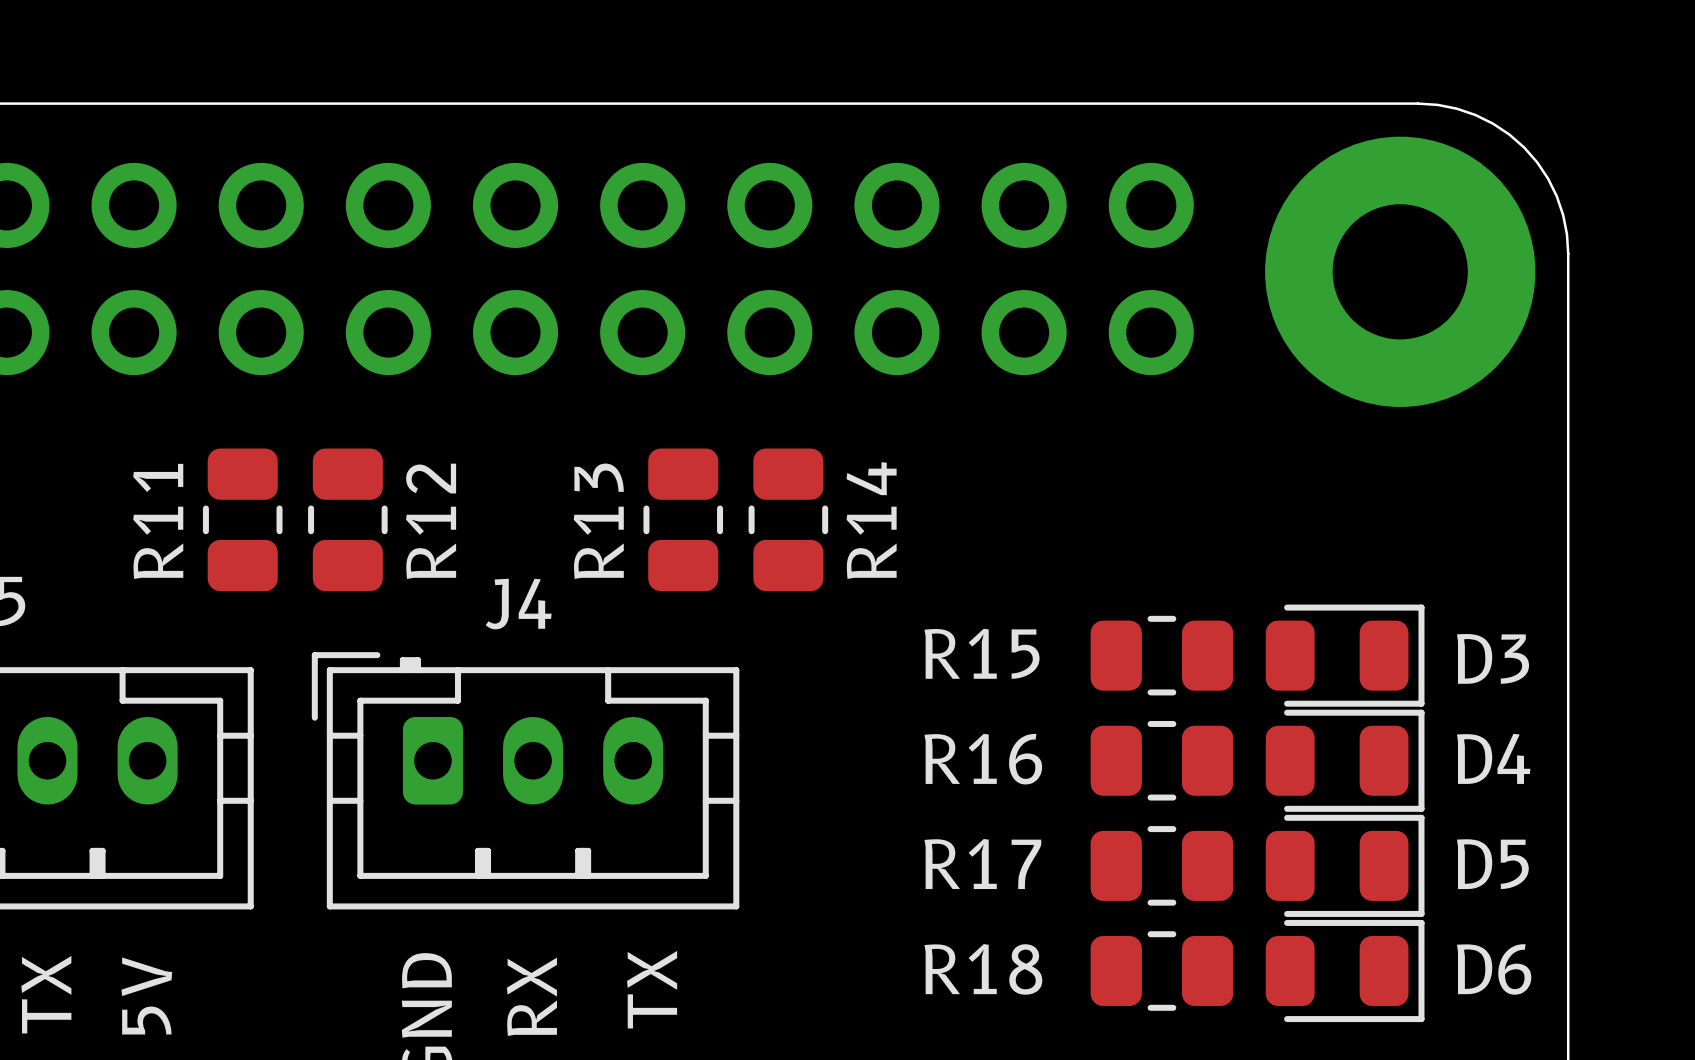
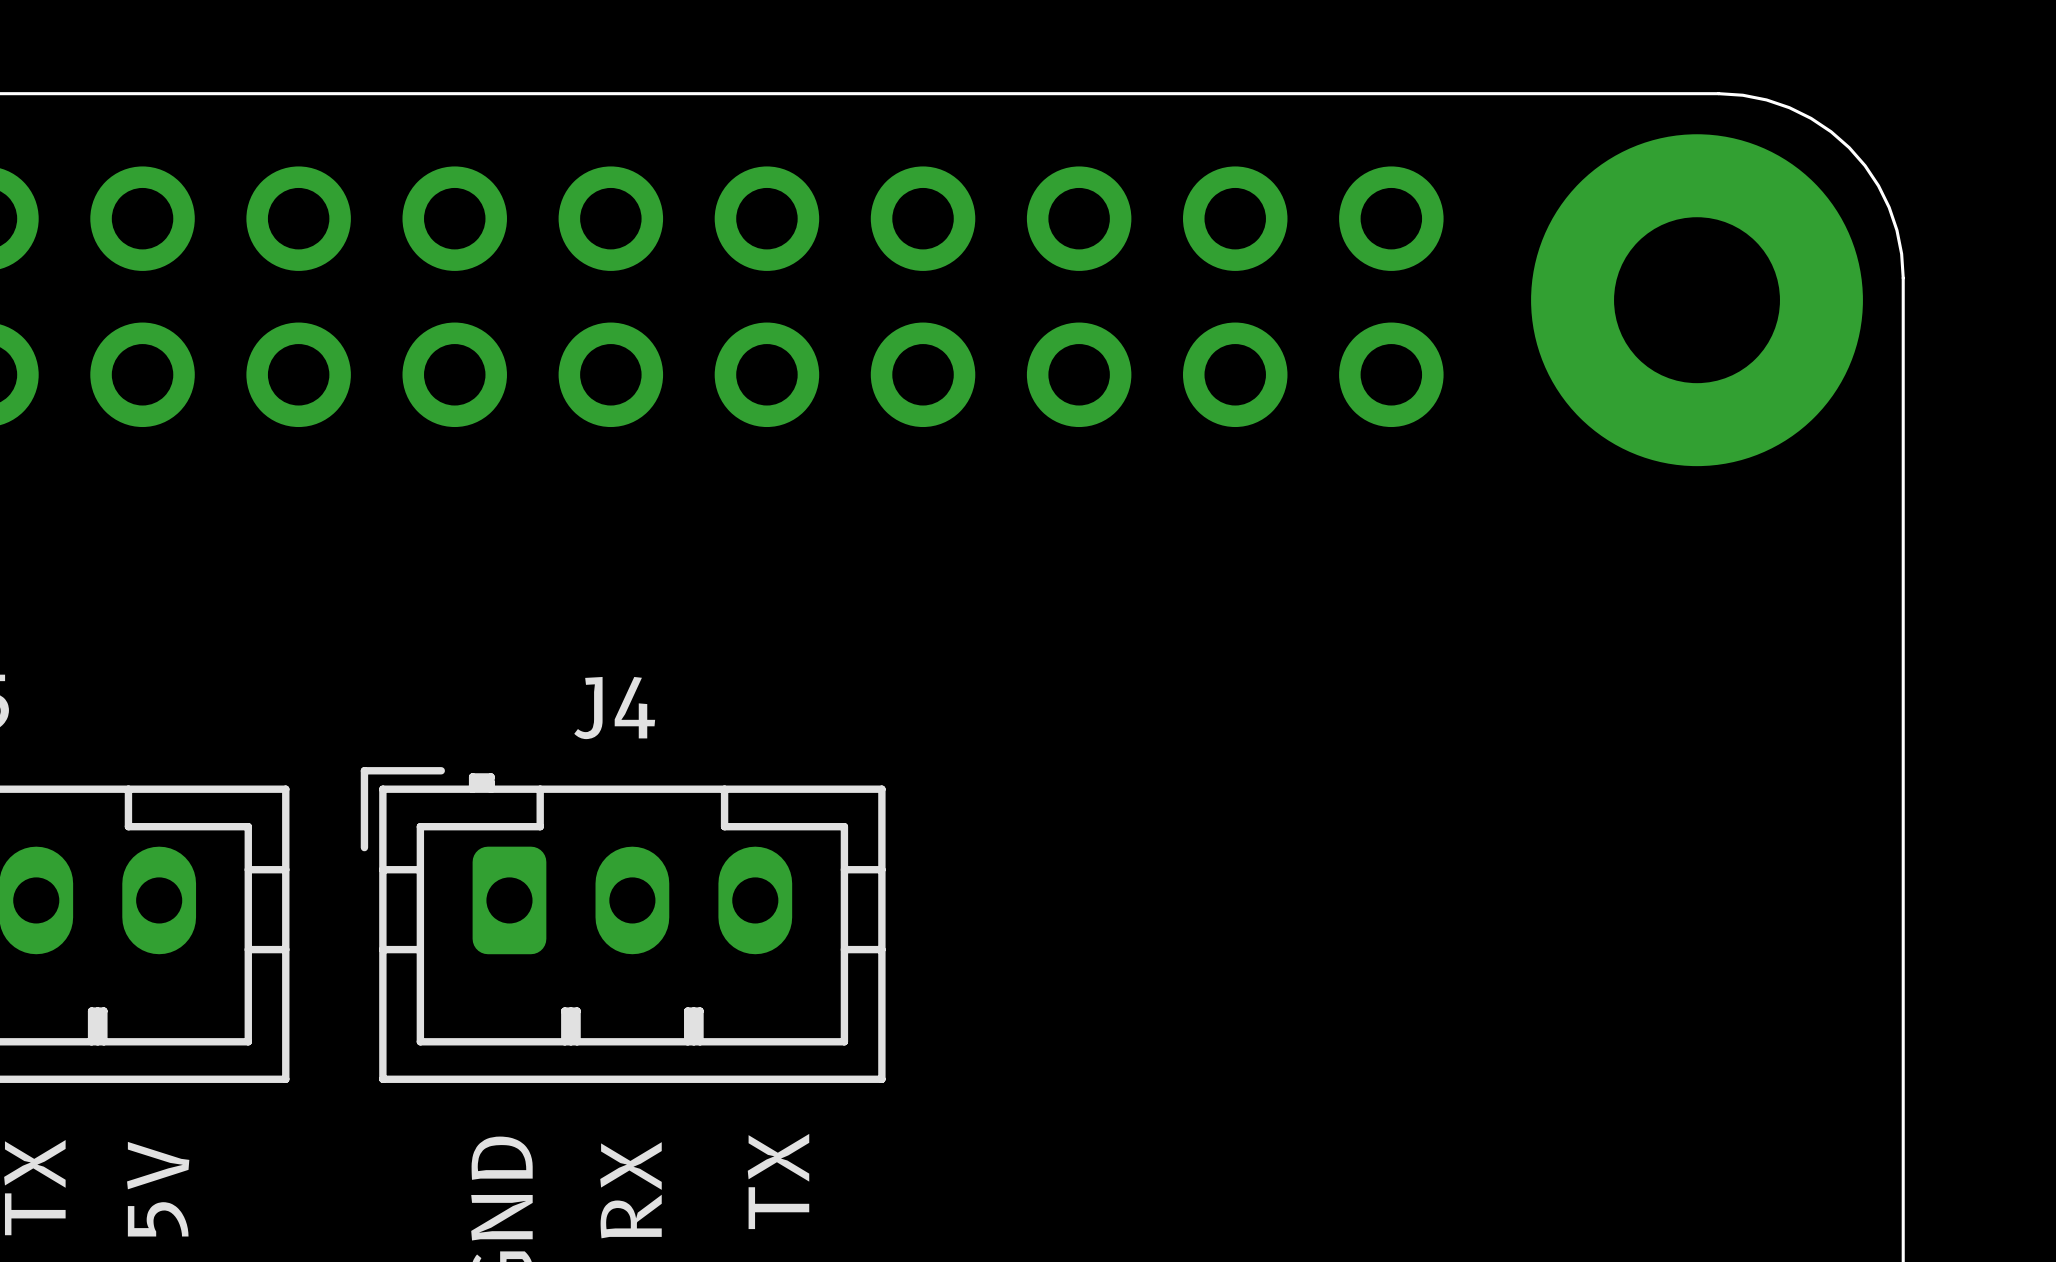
R11: (242, 519) -> none
R12: (347, 519) -> none
R13: (683, 519) -> none
R14: (788, 519) -> none
R15: (1161, 655) -> none
D3: (1345, 655) -> none
R16: (1161, 760) -> none
D4: (1345, 760) -> none
R17: (1161, 865) -> none
D5: (1345, 865) -> none
R18: (1161, 971) -> none
D6: (1345, 971) -> none

